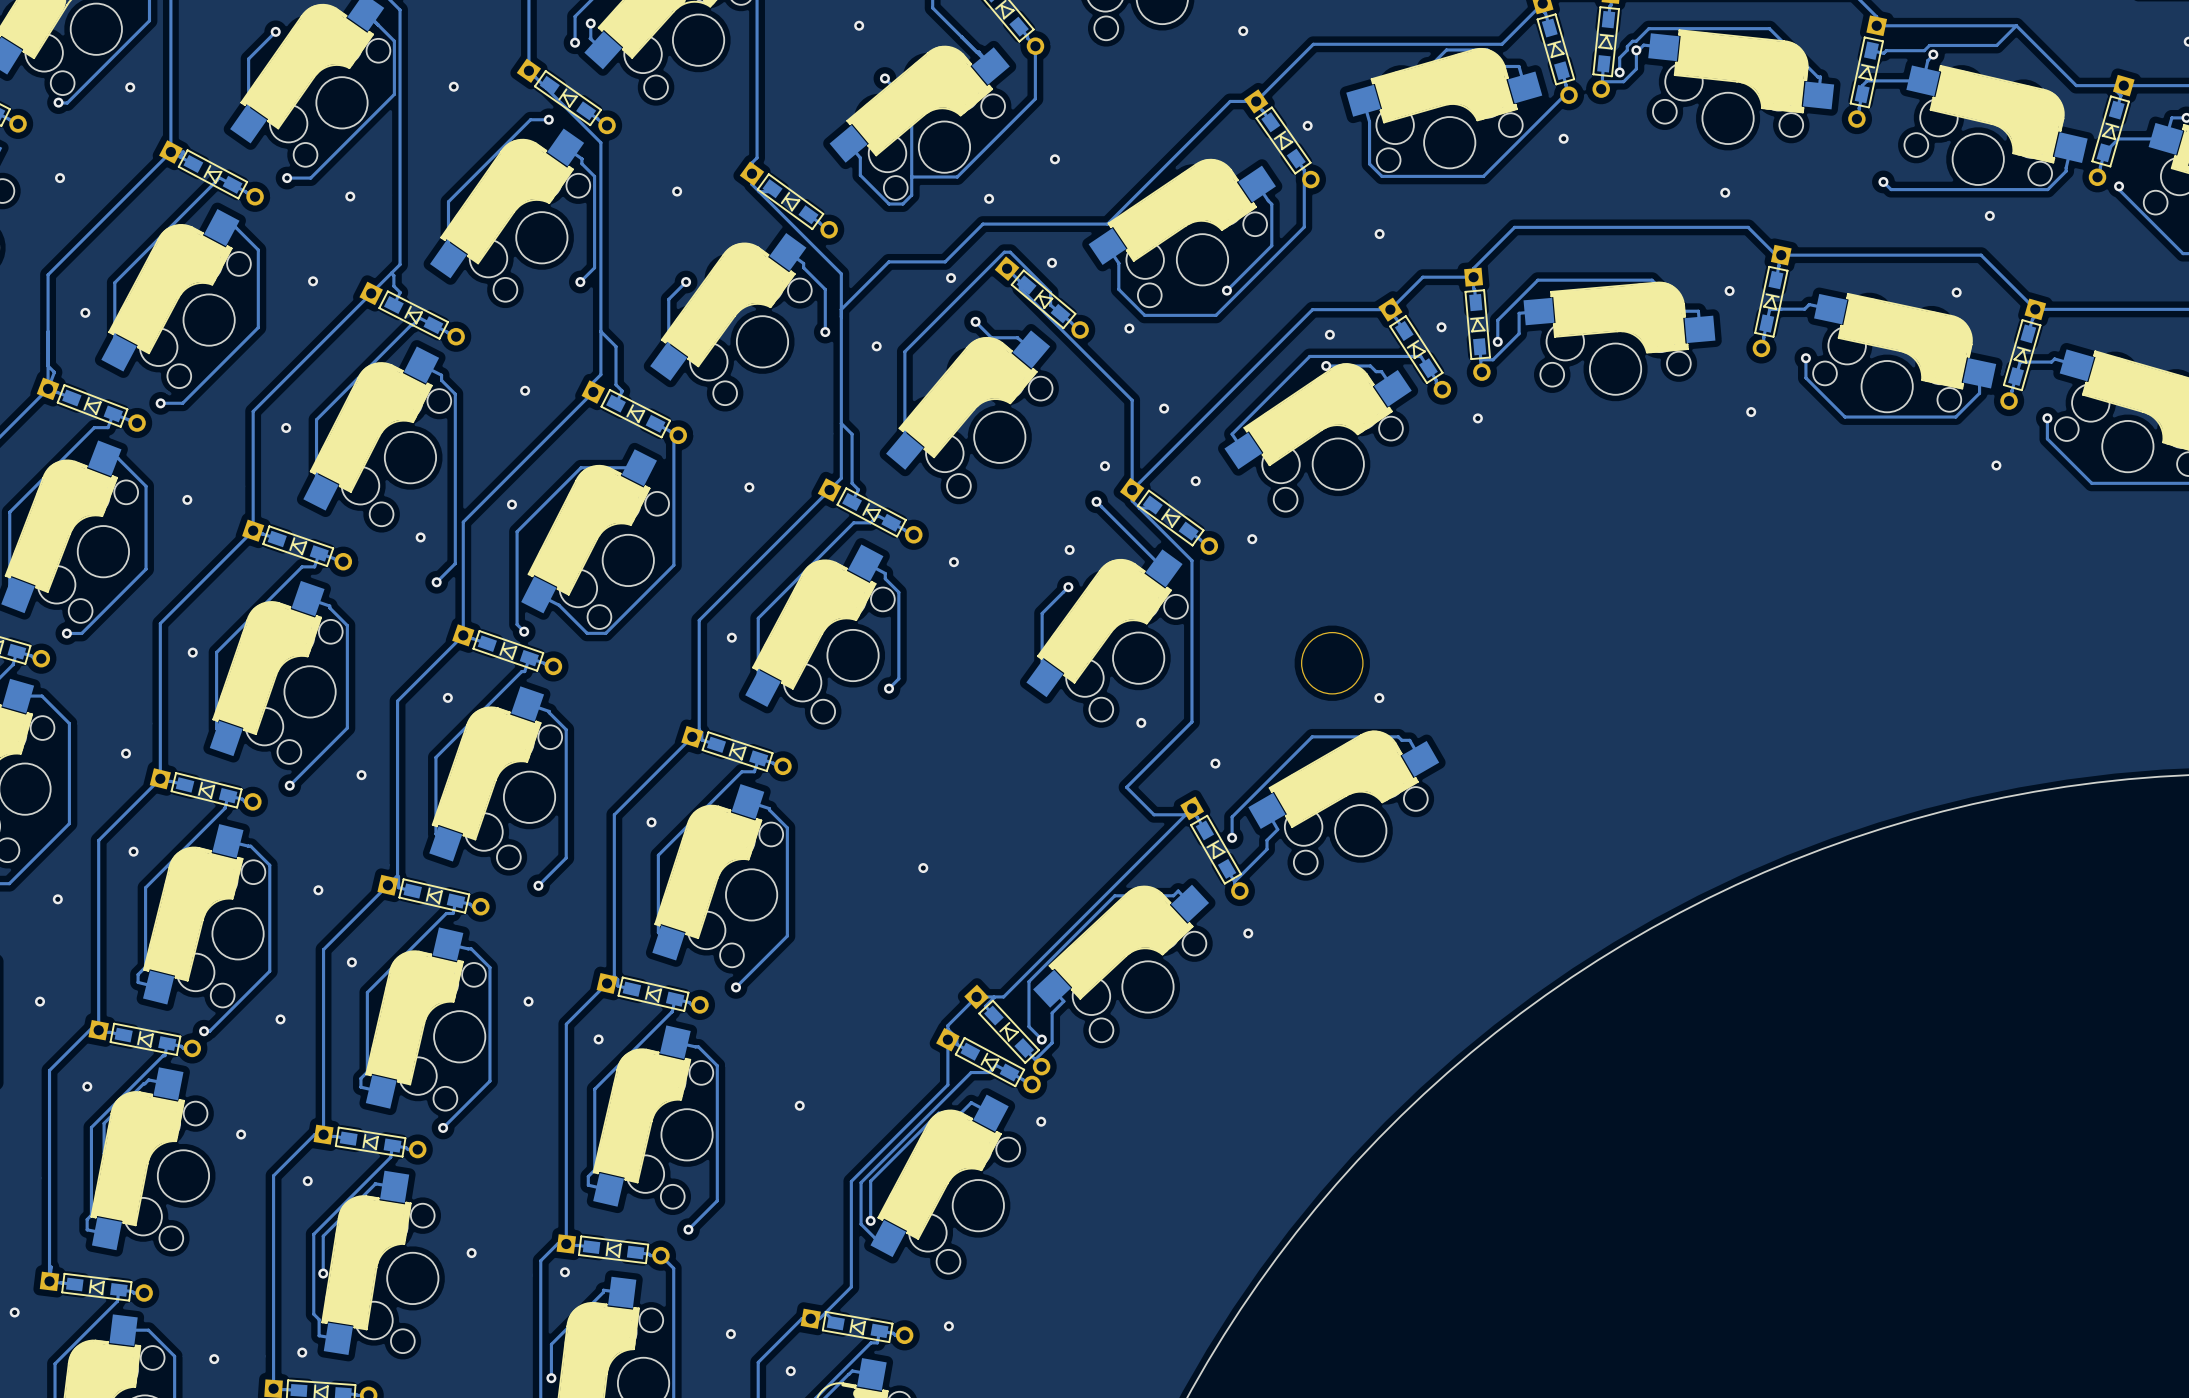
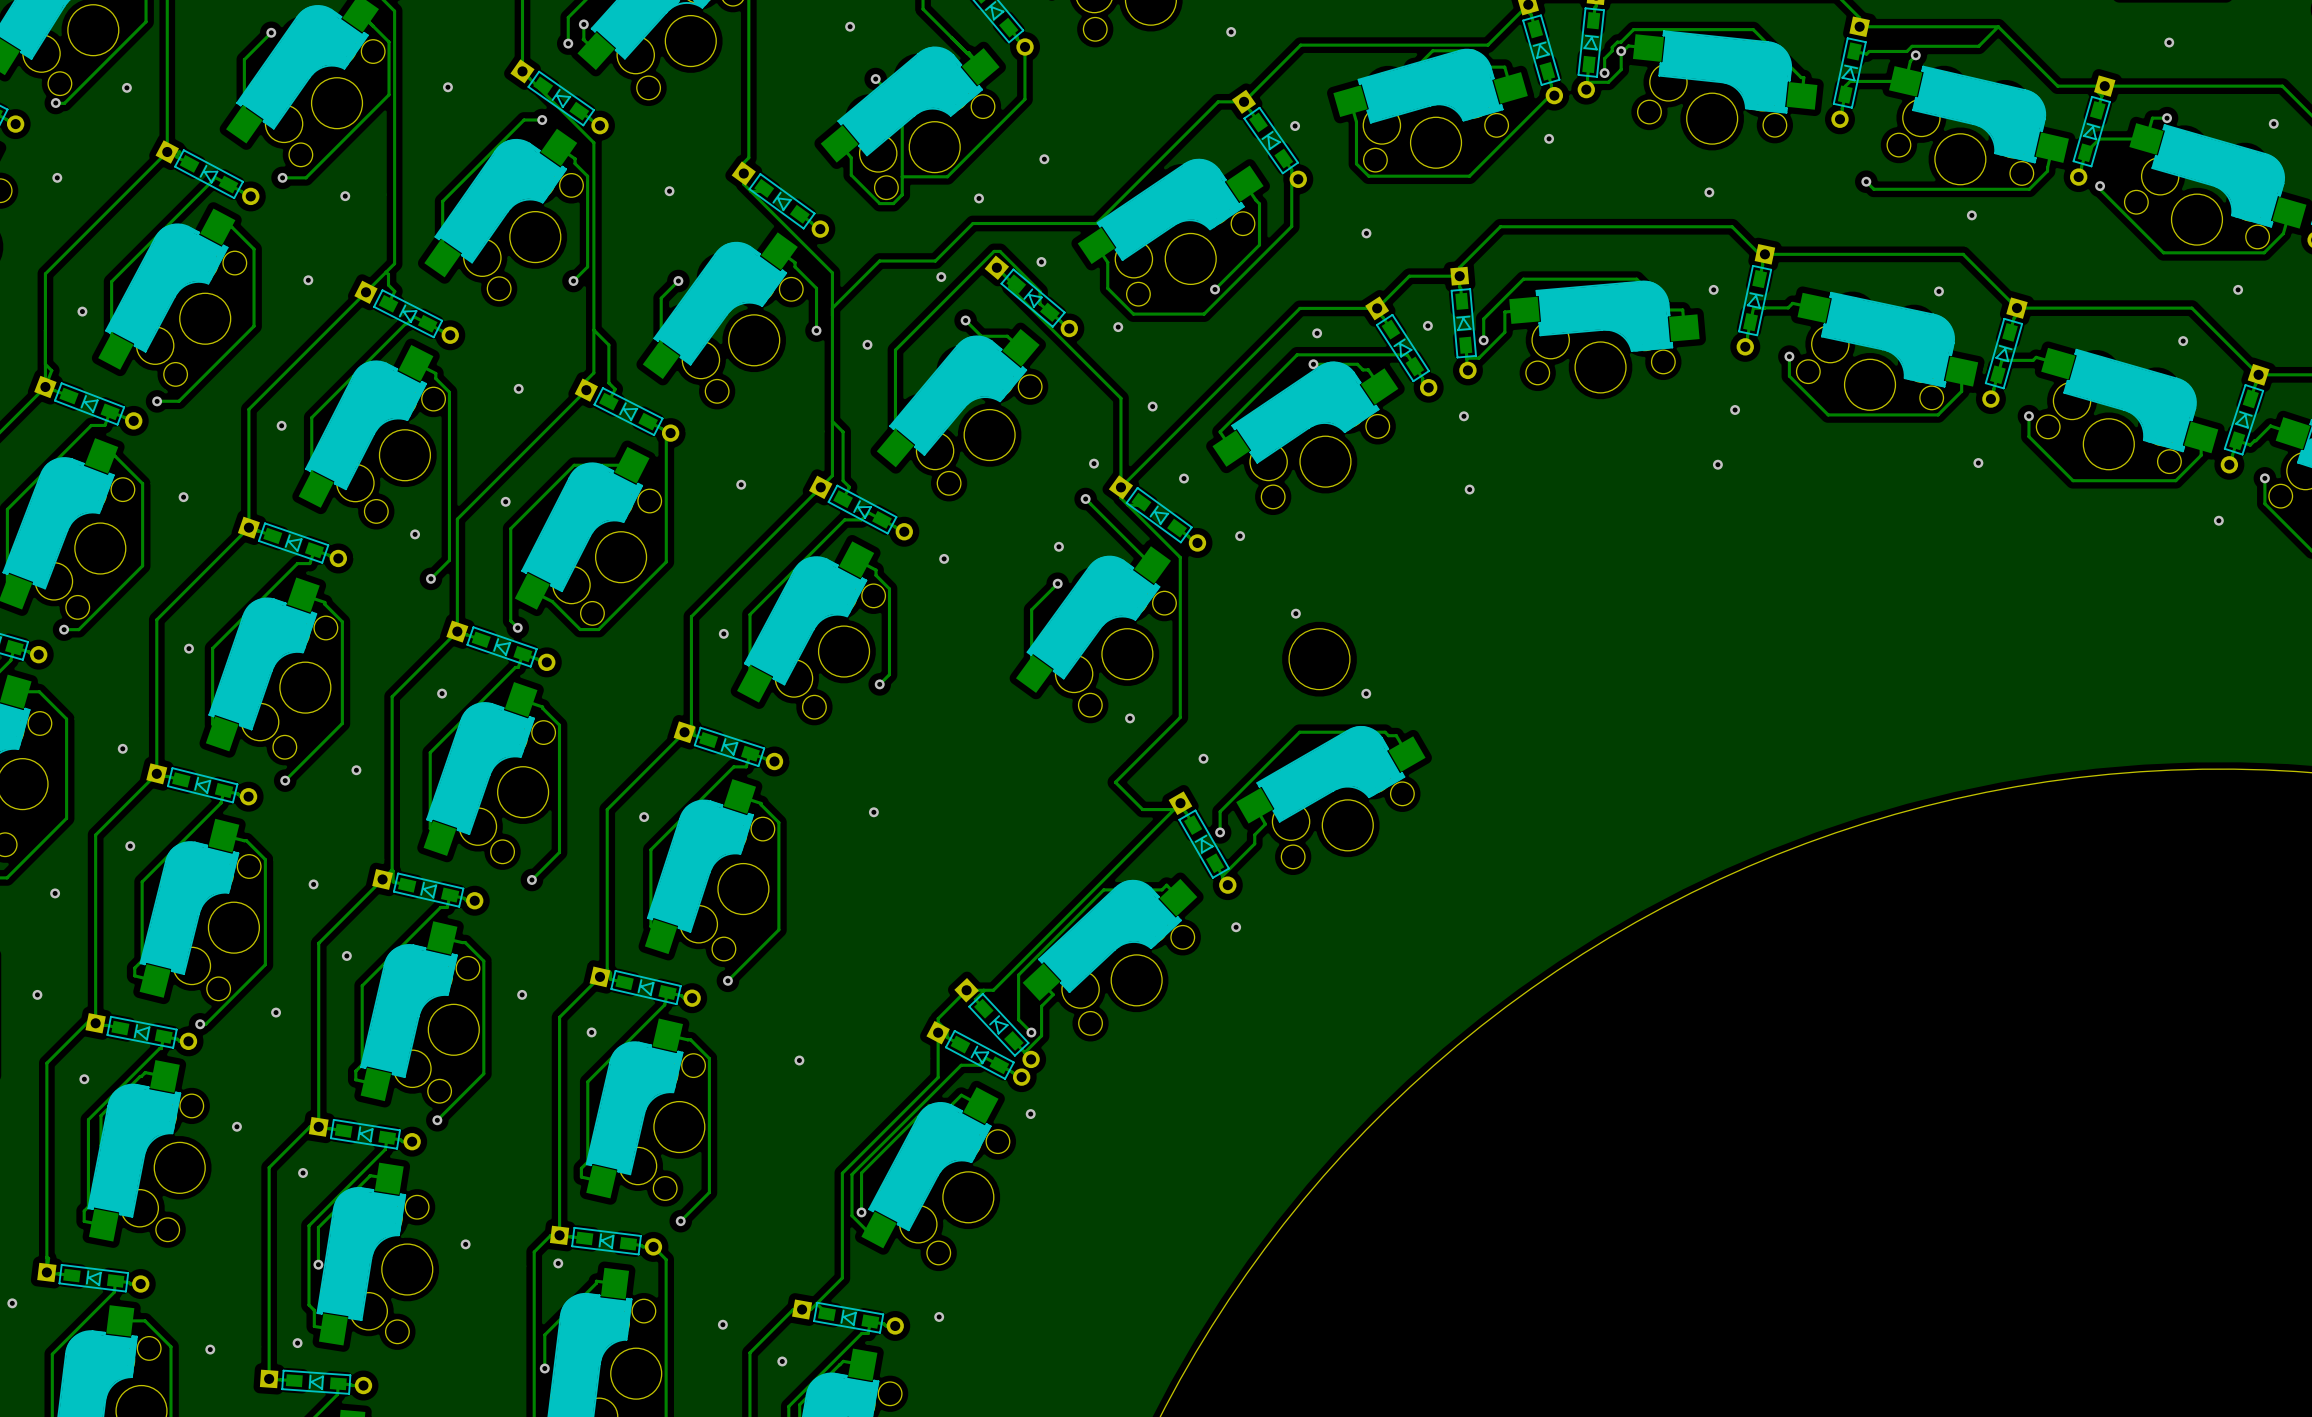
via: none -> (1717, 464)
via: none -> (1469, 489)
via: none -> (1295, 613)
via position: (923, 868) -> (873, 812)
via position: (799, 1105) -> (799, 1060)

